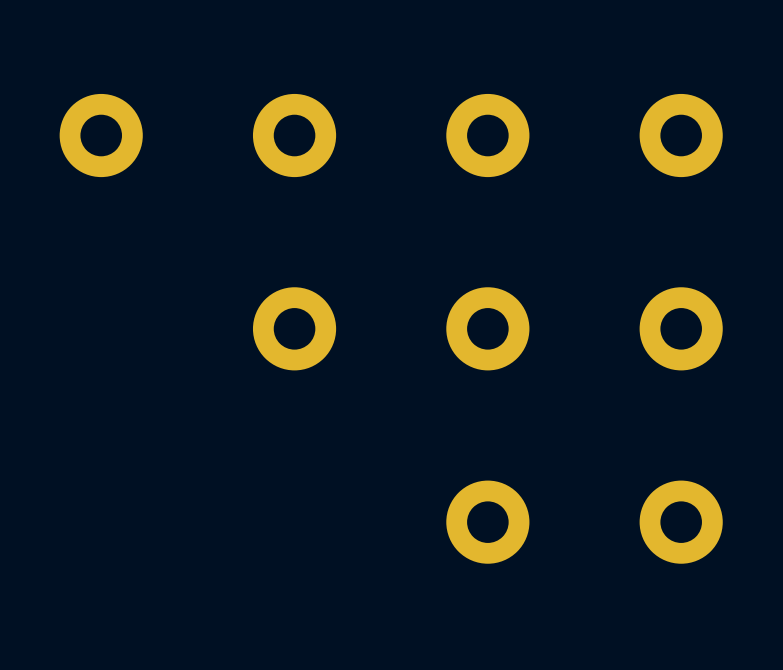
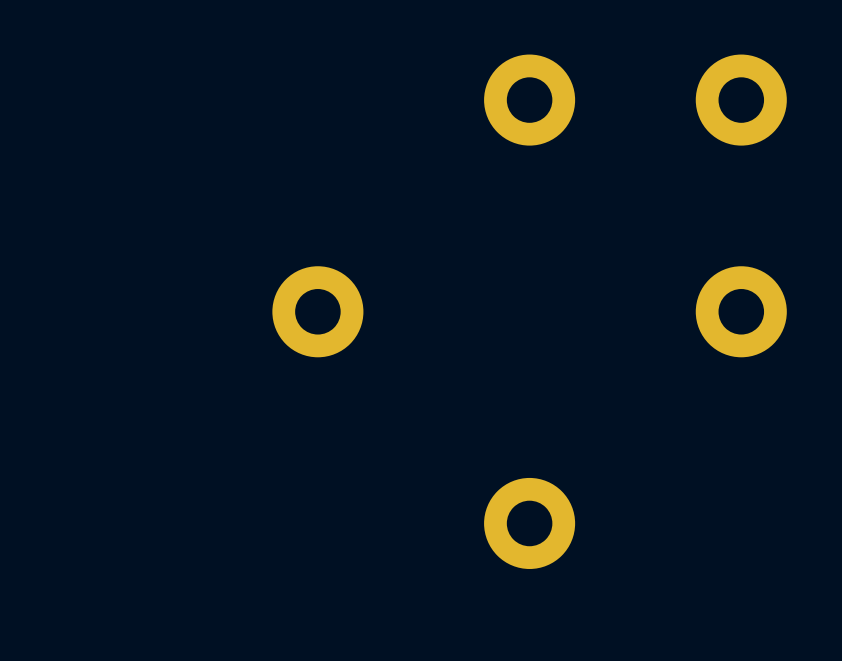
part: (101, 135) -> none
part: (294, 135) -> none
part: (487, 328) -> none
part: (681, 522) -> none

